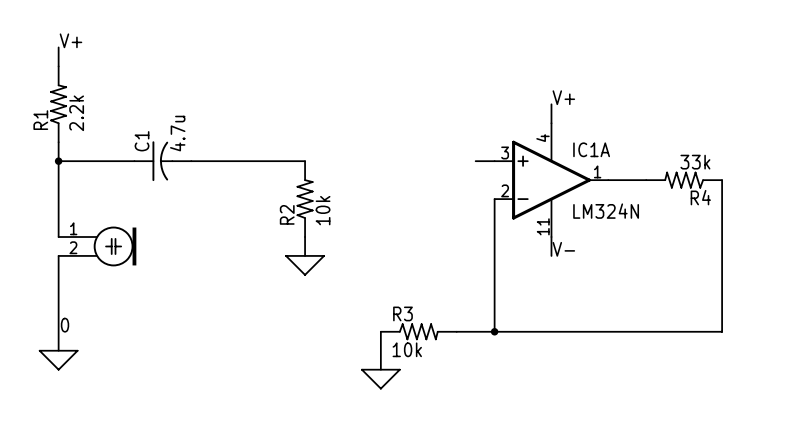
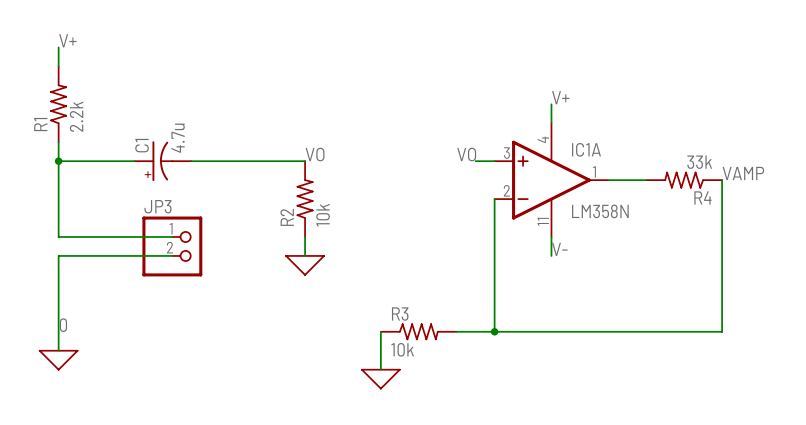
C1 symbol: [134, 141, 192, 182] -> [134, 141, 192, 182]
label: none -> VO (315, 154)
label: none -> VO (466, 154)
label: none -> VAMP (743, 173)
IC1A value: LM324N (606, 211) -> LM358N (600, 211)
wire: none -> (58, 237) (172, 237)
part: (97, 246) -> none
JP3: none -> (172, 246)
wire: none -> (58, 255) (172, 255)

